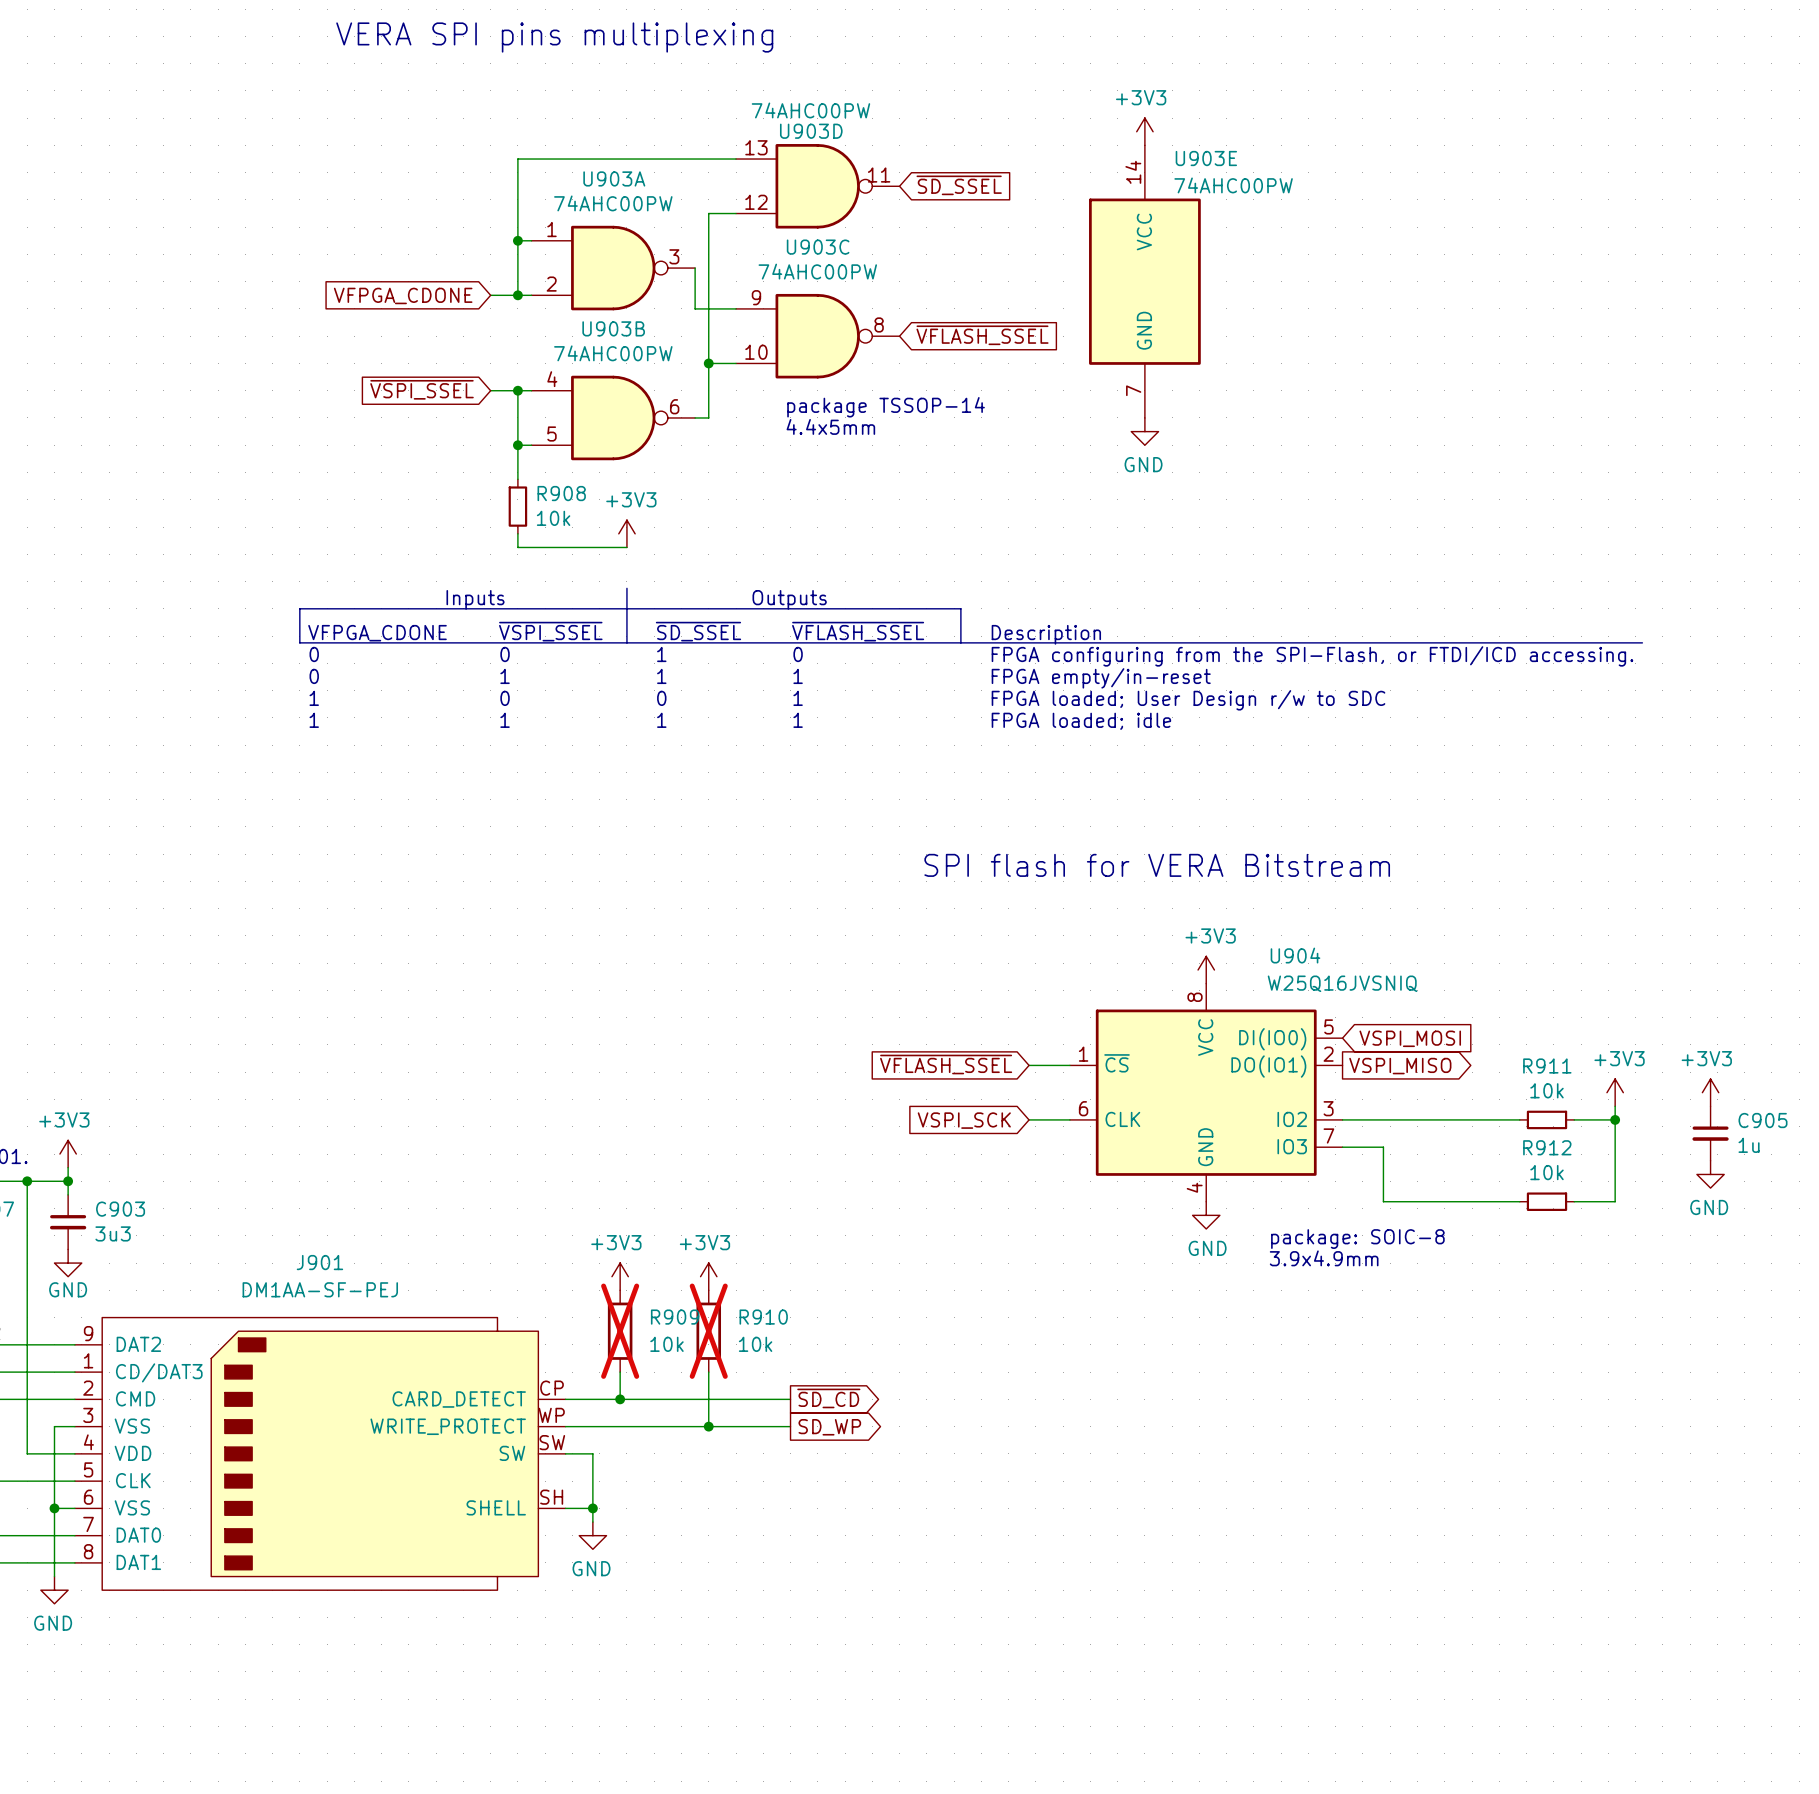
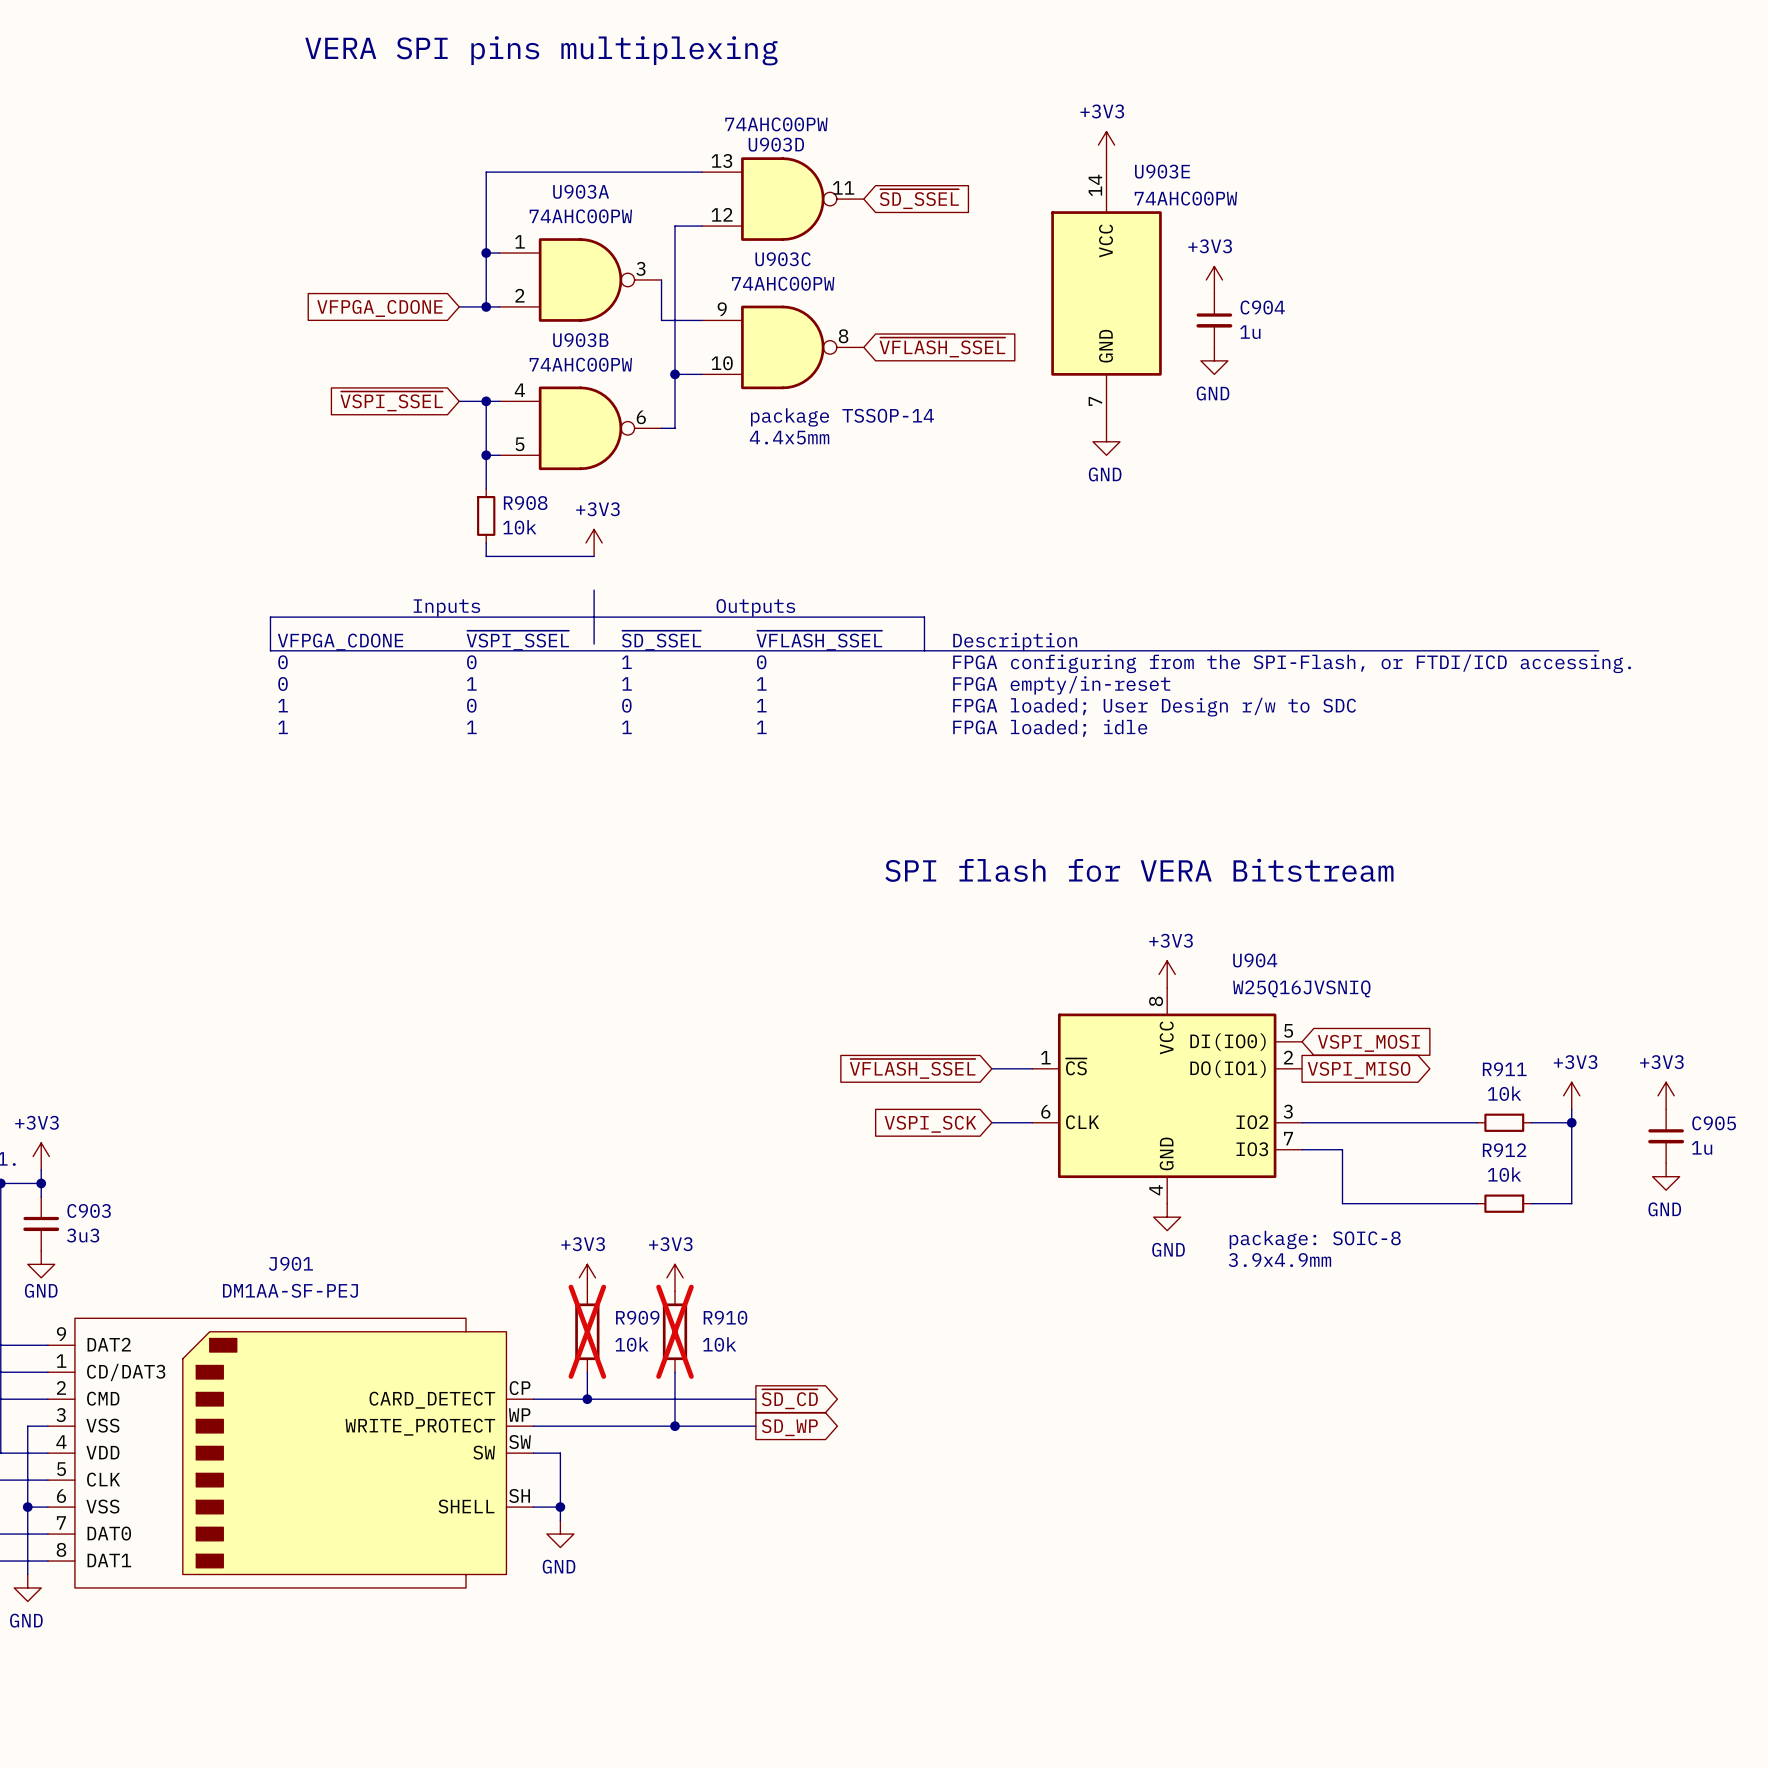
power symbol: none -> +3V3 (1214, 279)
C904: none -> 1u (1214, 320)
power symbol: none -> GND (1214, 360)
line: (626, 636) (626, 642) -> (594, 590) (594, 596)

